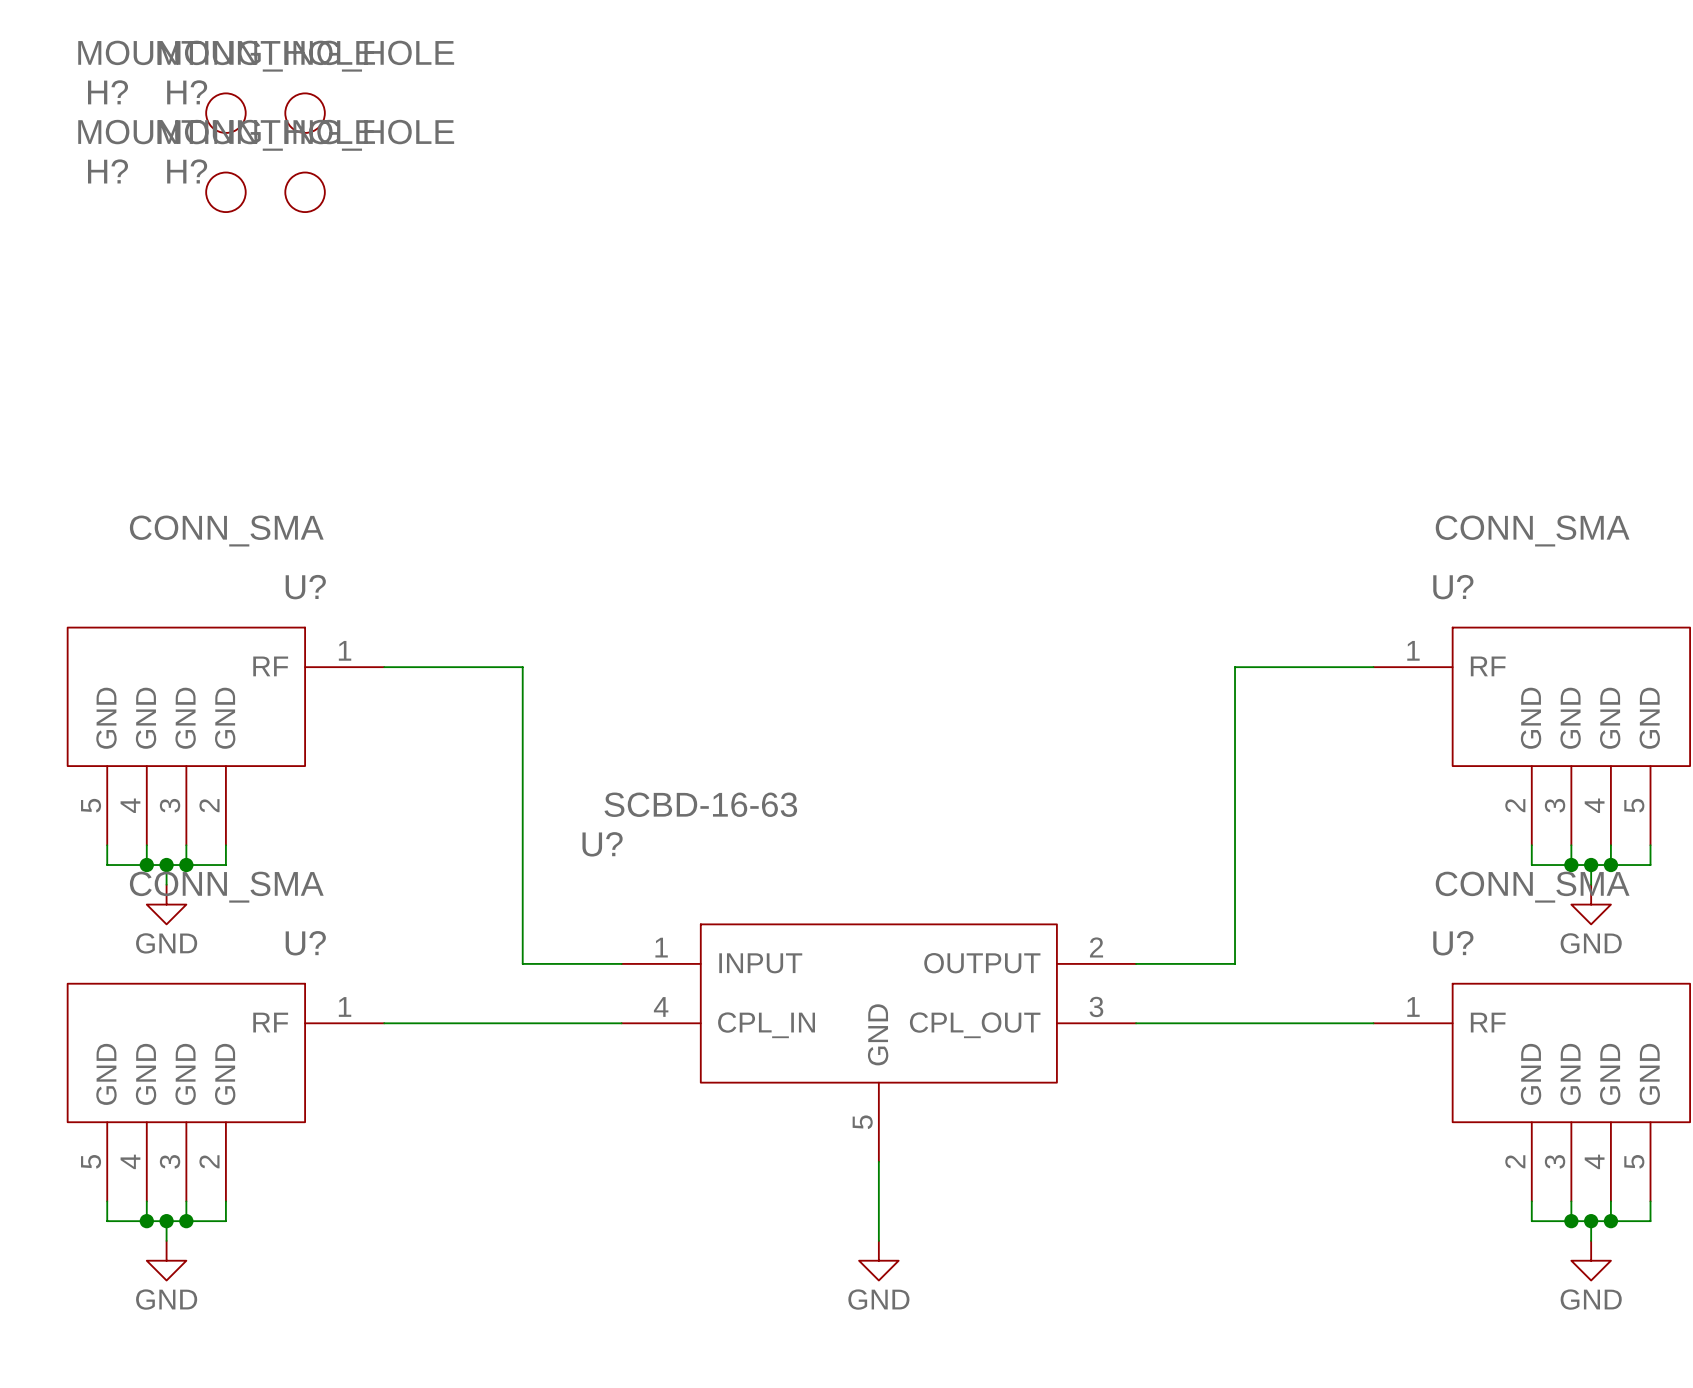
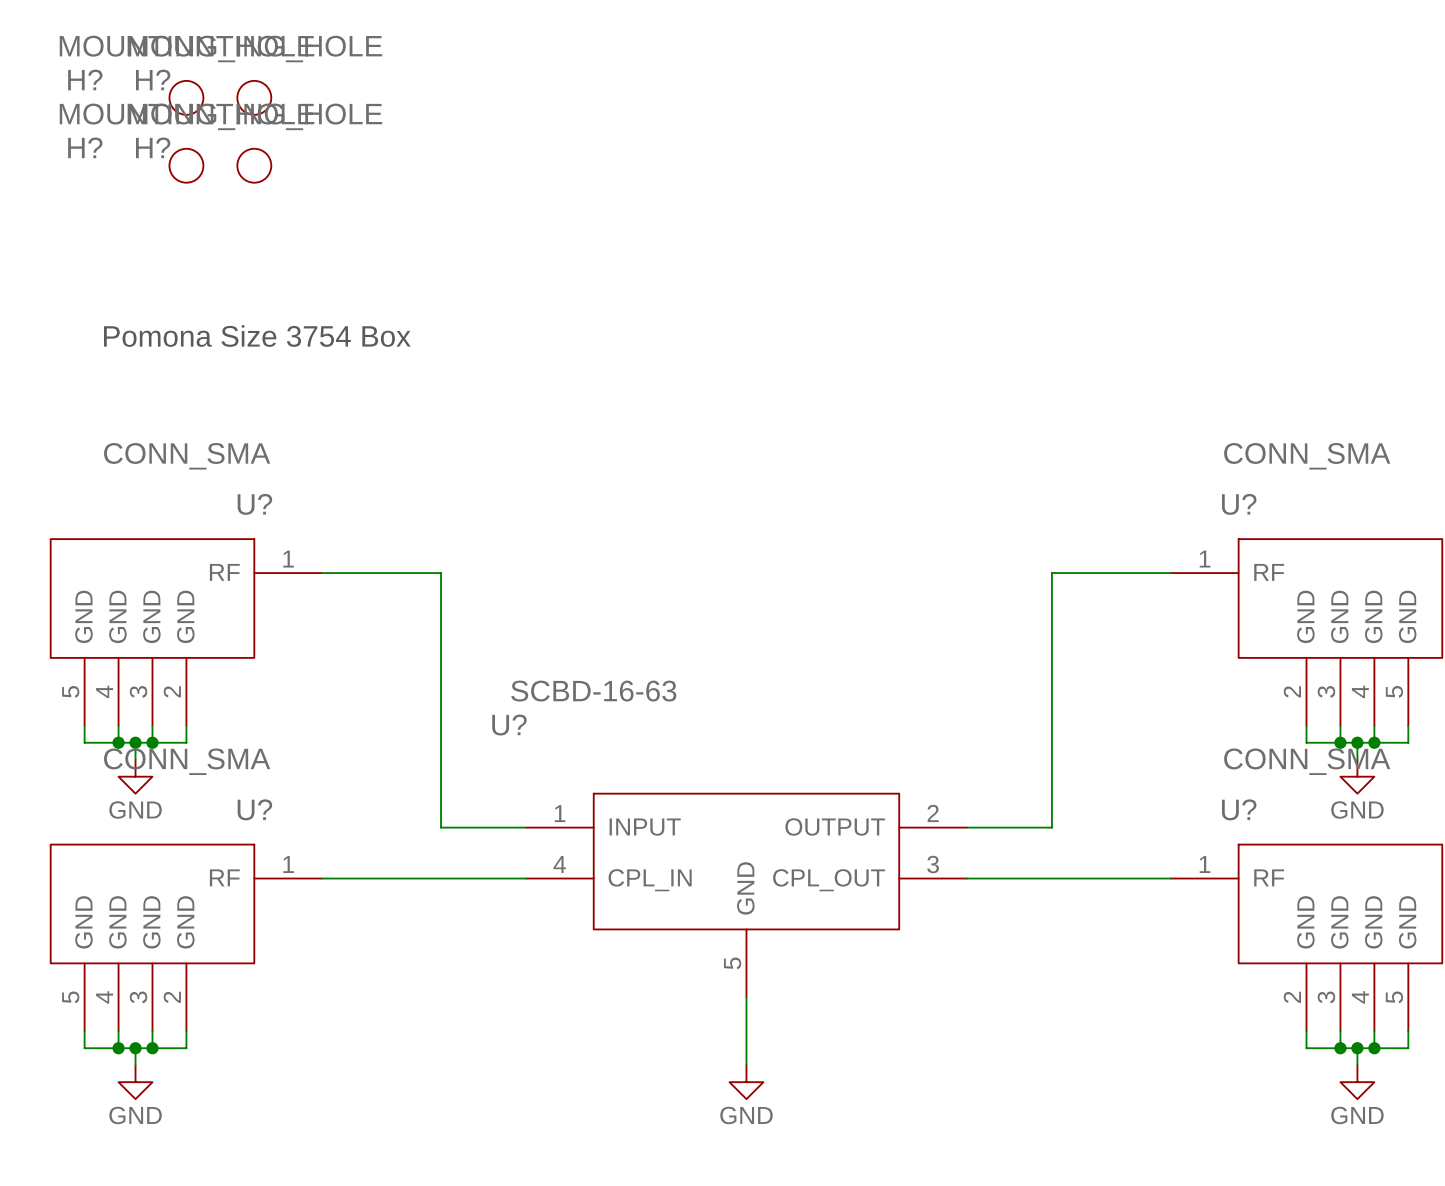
text: none -> Pomona Size 3754 Box (257, 336)

